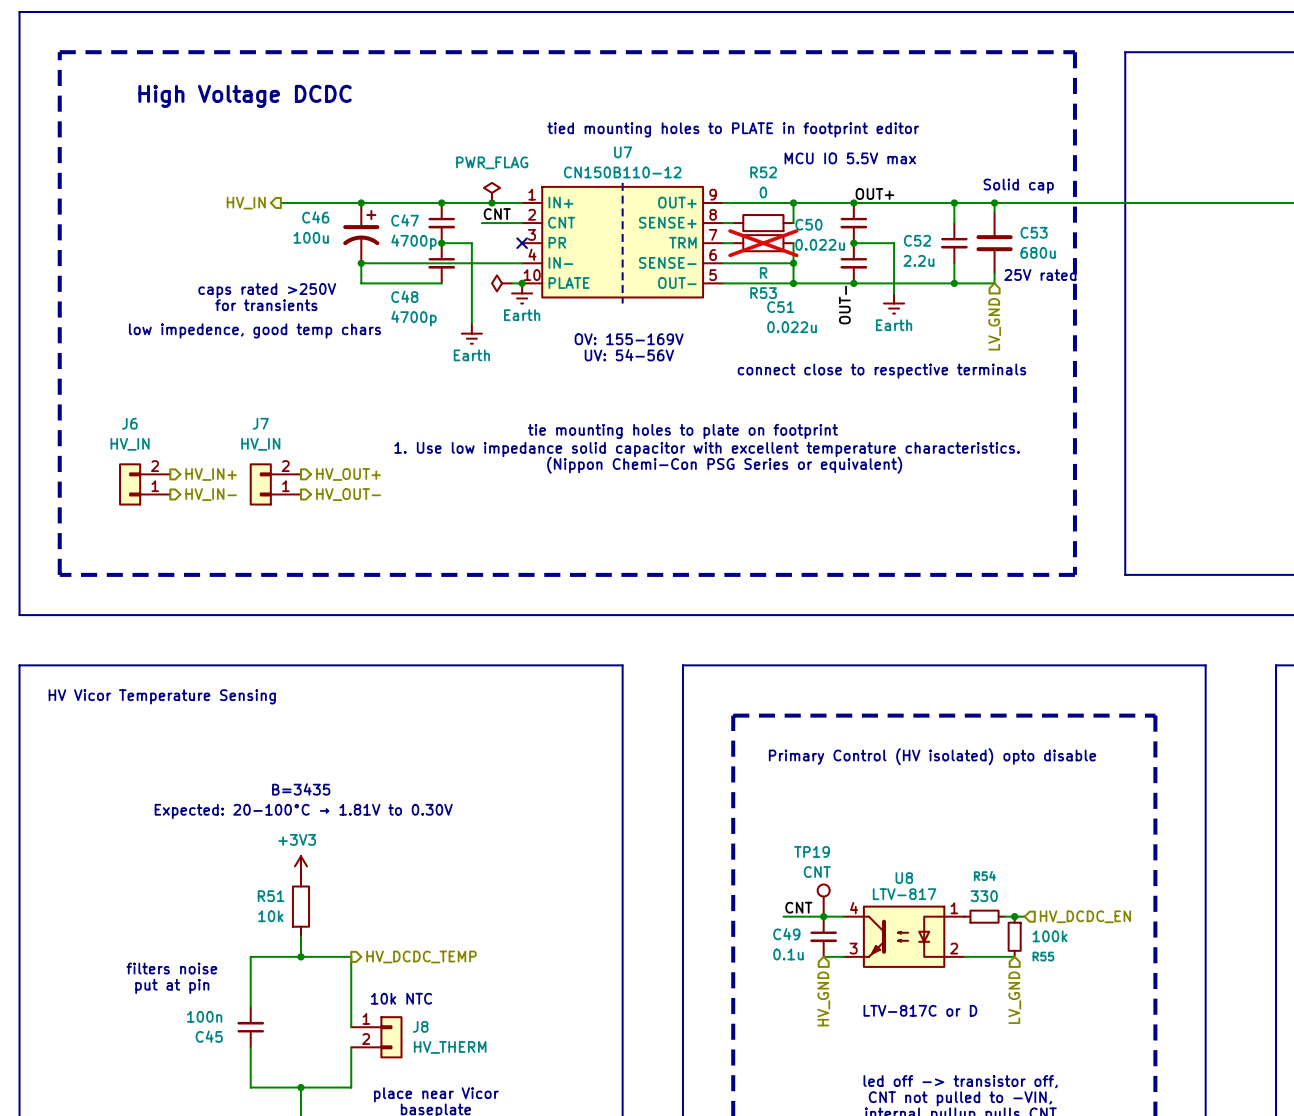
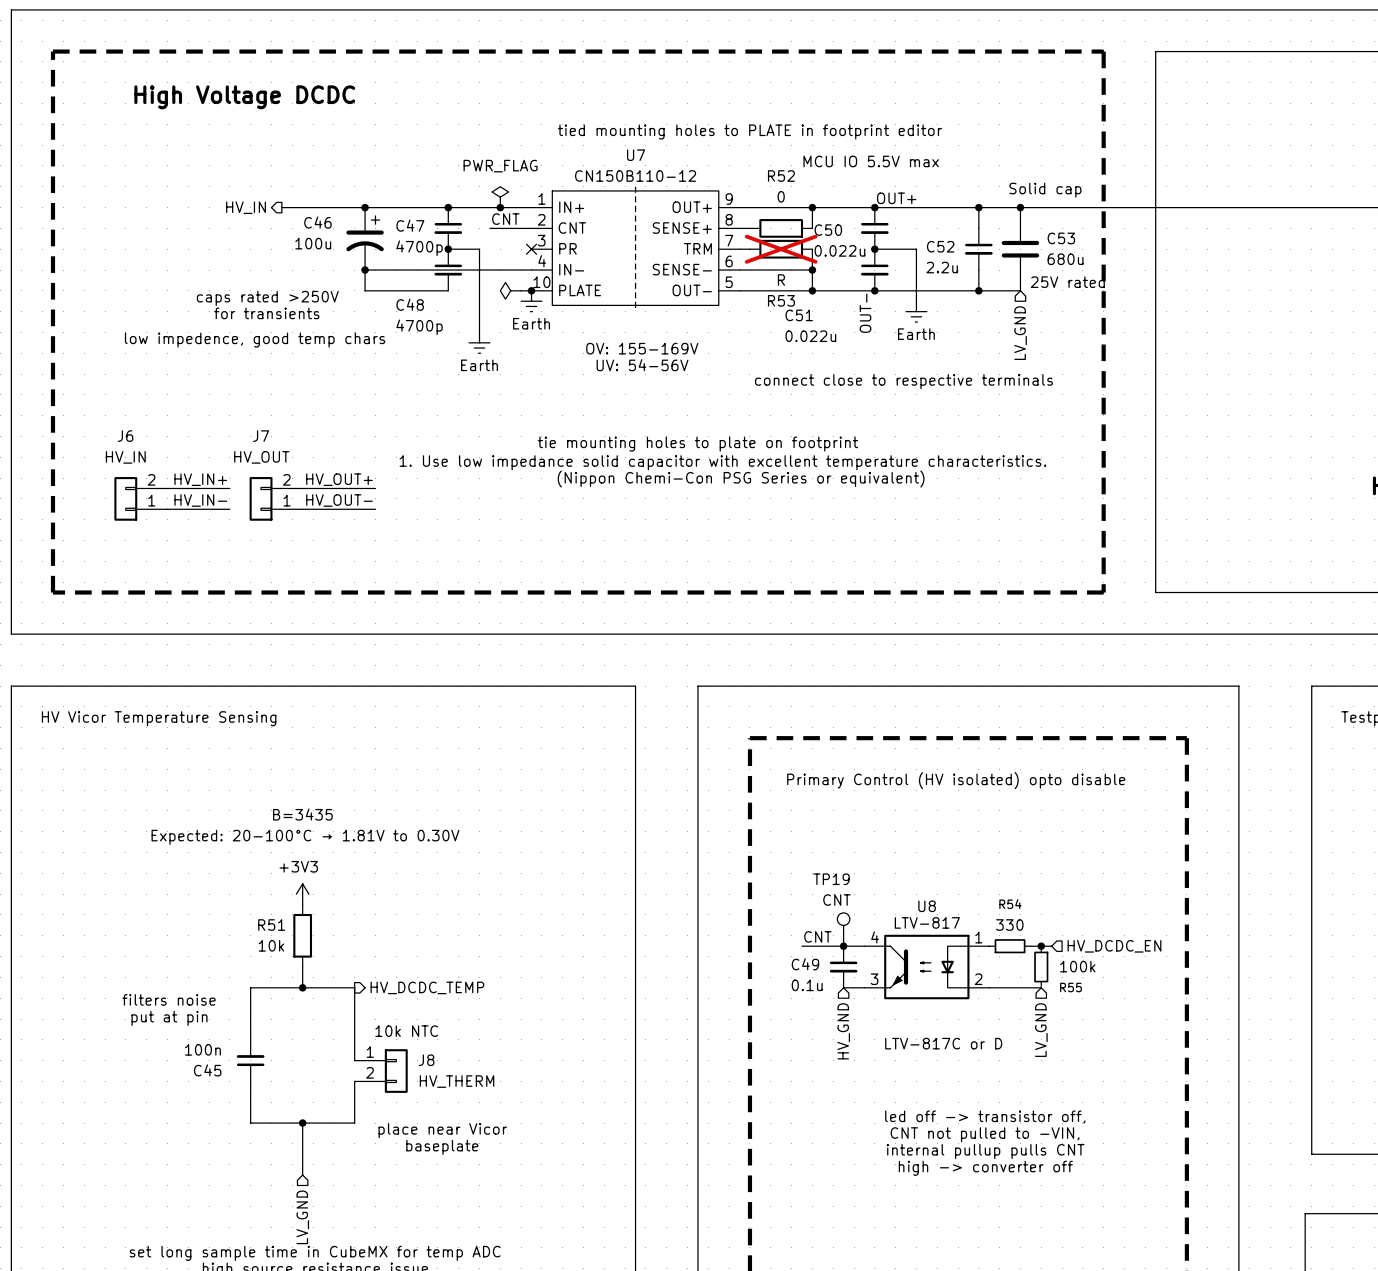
J7 value: HV_IN (260, 444) -> HV_OUT (261, 457)
label: none -> HV_IN+ (200, 479)
label: none -> HV_OUT+ (339, 479)
wire: none -> (167, 488) (229, 488)
hierarchical label: HV_IN+ (211, 474) -> none
wire: none -> (302, 488) (375, 488)
hierarchical label: HV_OUT+ (348, 474) -> none
label: none -> HV_IN- (200, 500)
label: none -> HV_OUT- (339, 500)
wire: none -> (167, 509) (229, 509)
hierarchical label: HV_IN- (211, 494) -> none
wire: none -> (302, 509) (375, 509)
hierarchical label: HV_OUT- (348, 494) -> none

